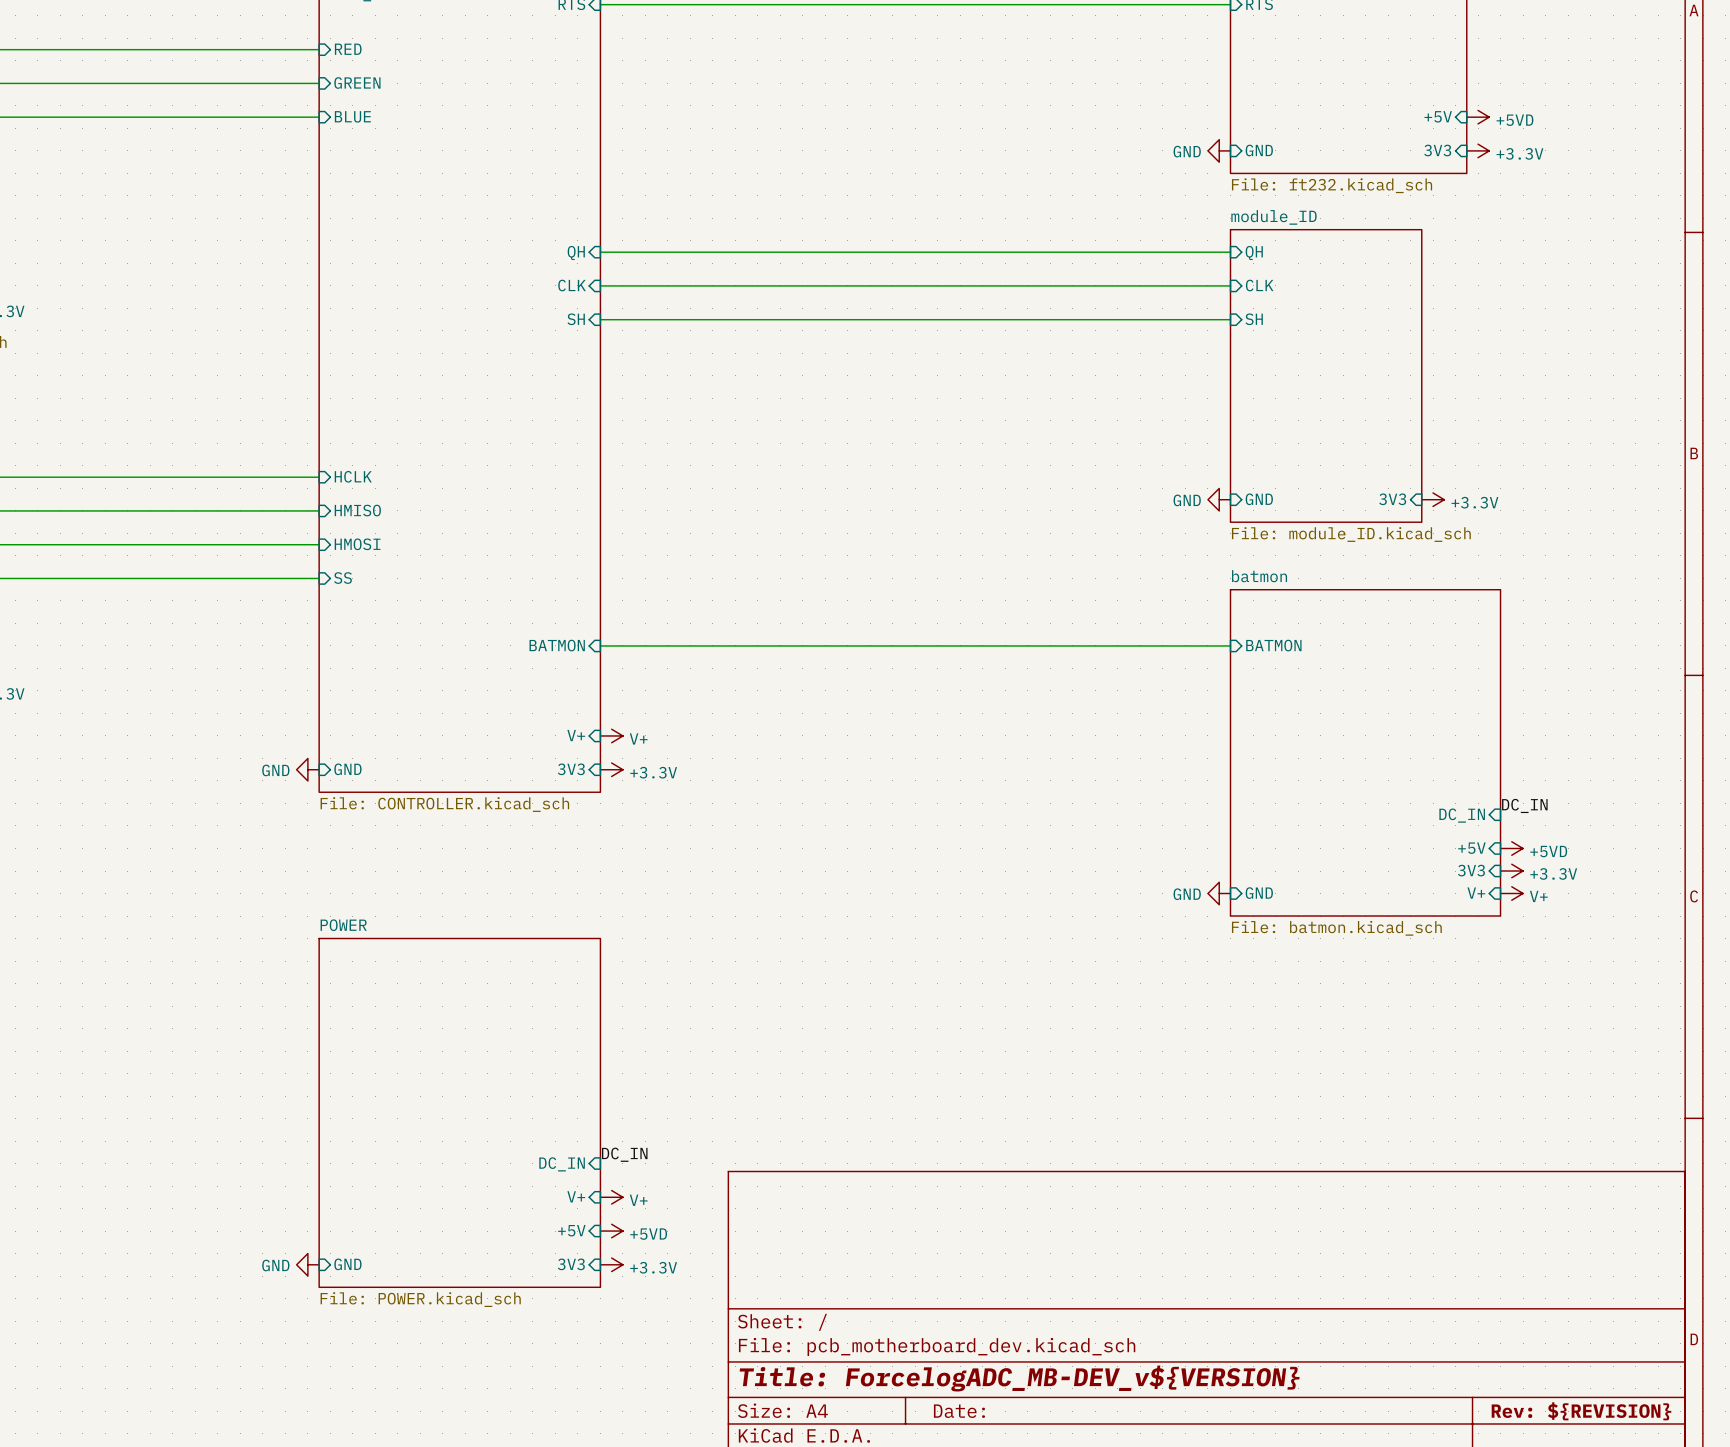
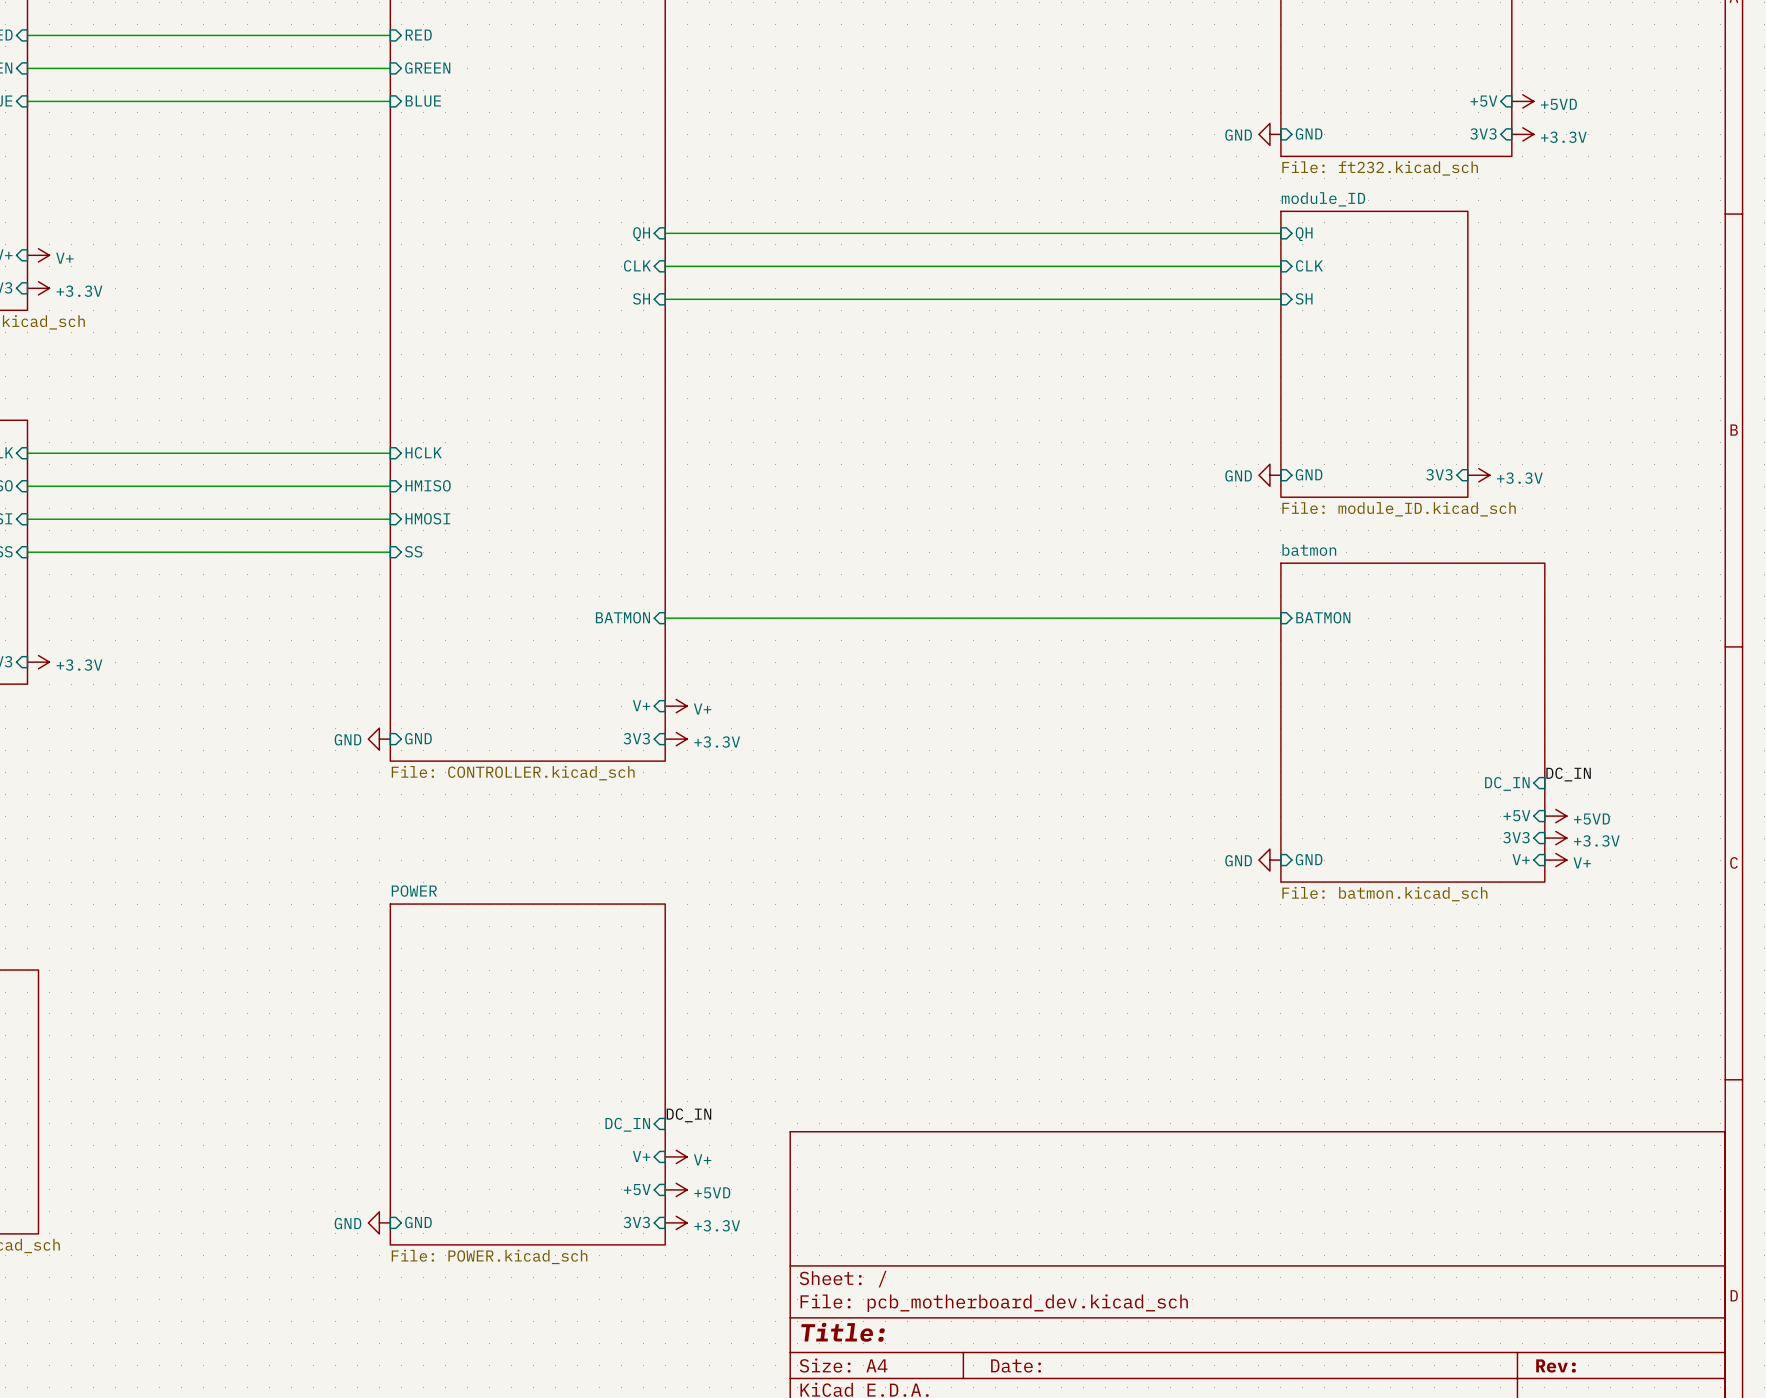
title block: Title: ForcelogADC_MB-DEV_v${VERSION} (1019, 1378) -> Title: (843, 1332)
title block: Rev: ${REVISION} (1581, 1411) -> Rev: (1555, 1365)

